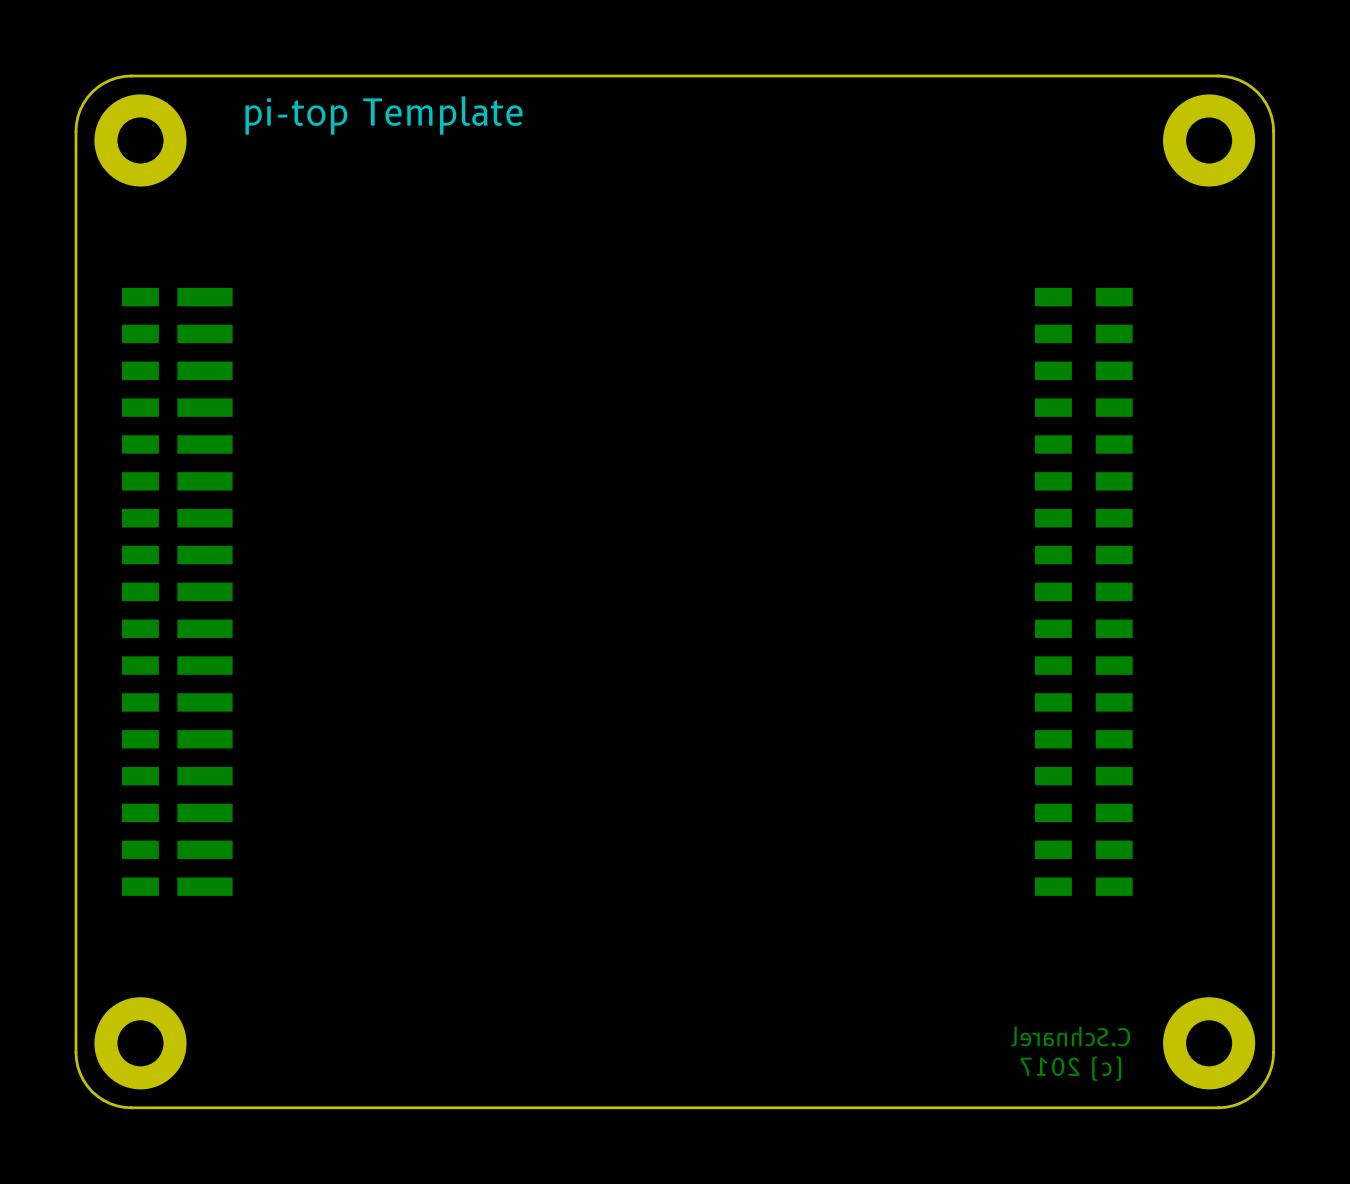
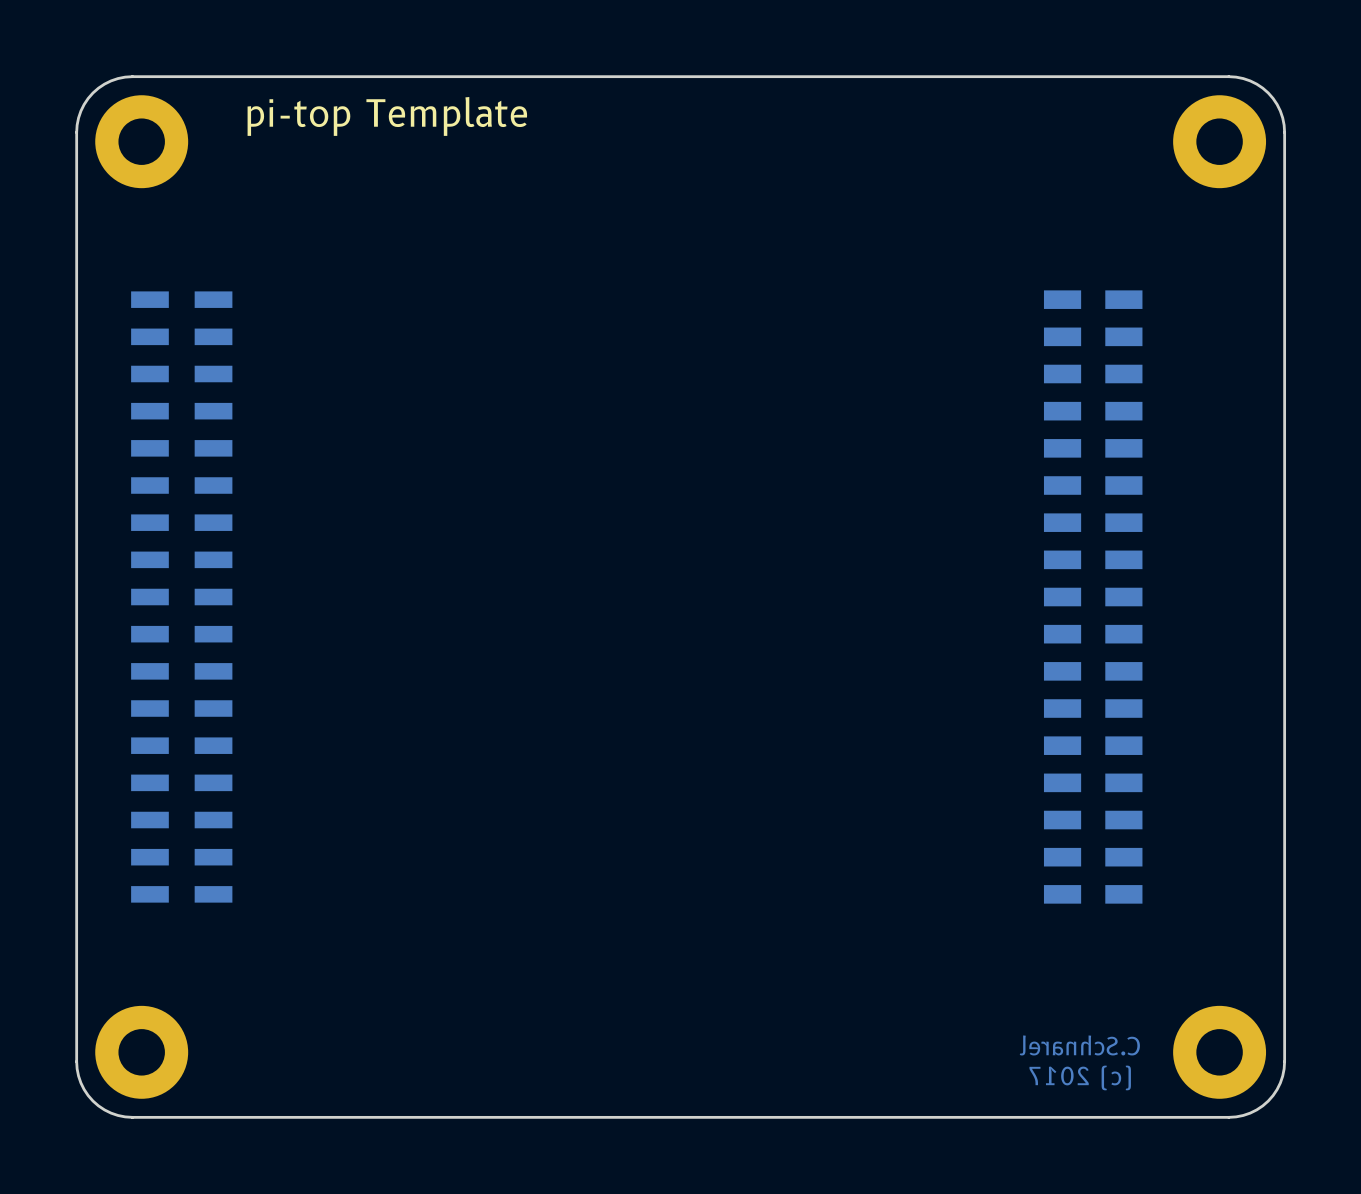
part footprint: [122, 287, 233, 896] -> [131, 291, 233, 903]

